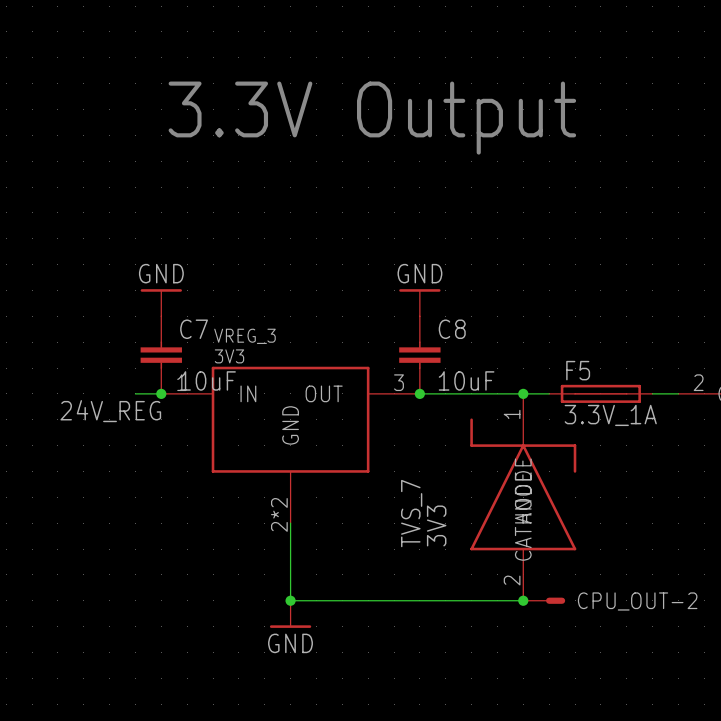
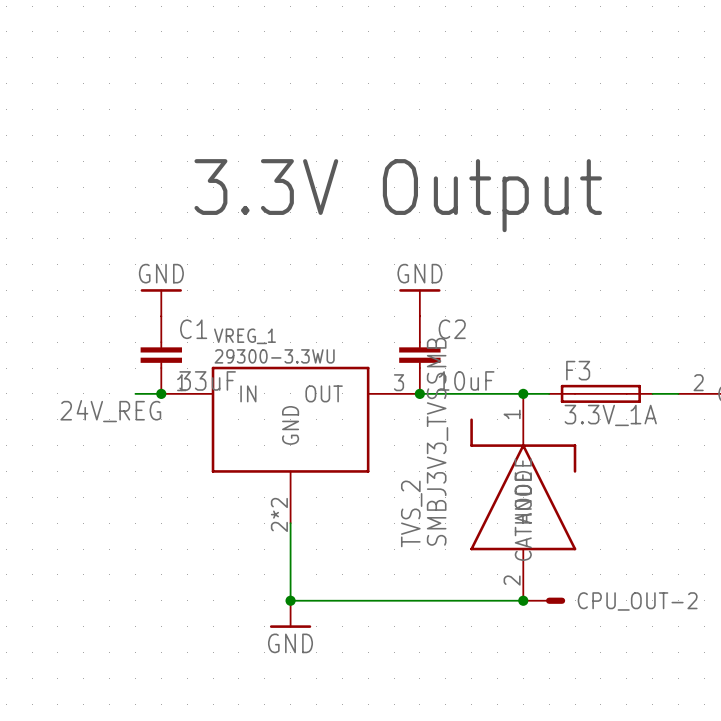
text position: 3.3V Output (372, 118) -> 3.3V Output (398, 195)
C7 name: C7 (194, 329) -> C1 (193, 329)
C8 name: C8 (452, 329) -> C2 (452, 329)
VREG_3 name: VREG_3 (244, 336) -> VREG_1 (244, 336)
VREG_3 value: 3V3 (229, 356) -> 29300-3.3WU (274, 356)
F5 name: F5 (578, 370) -> F3 (578, 370)
C7 value: 10uF (208, 380) -> 33uF (207, 380)
TVS_7 name: TVS_7 (411, 513) -> TVS_2 (411, 513)
TVS_7 value: 3V3 (436, 525) -> SMBJ3V3_TVSSMB (437, 441)

